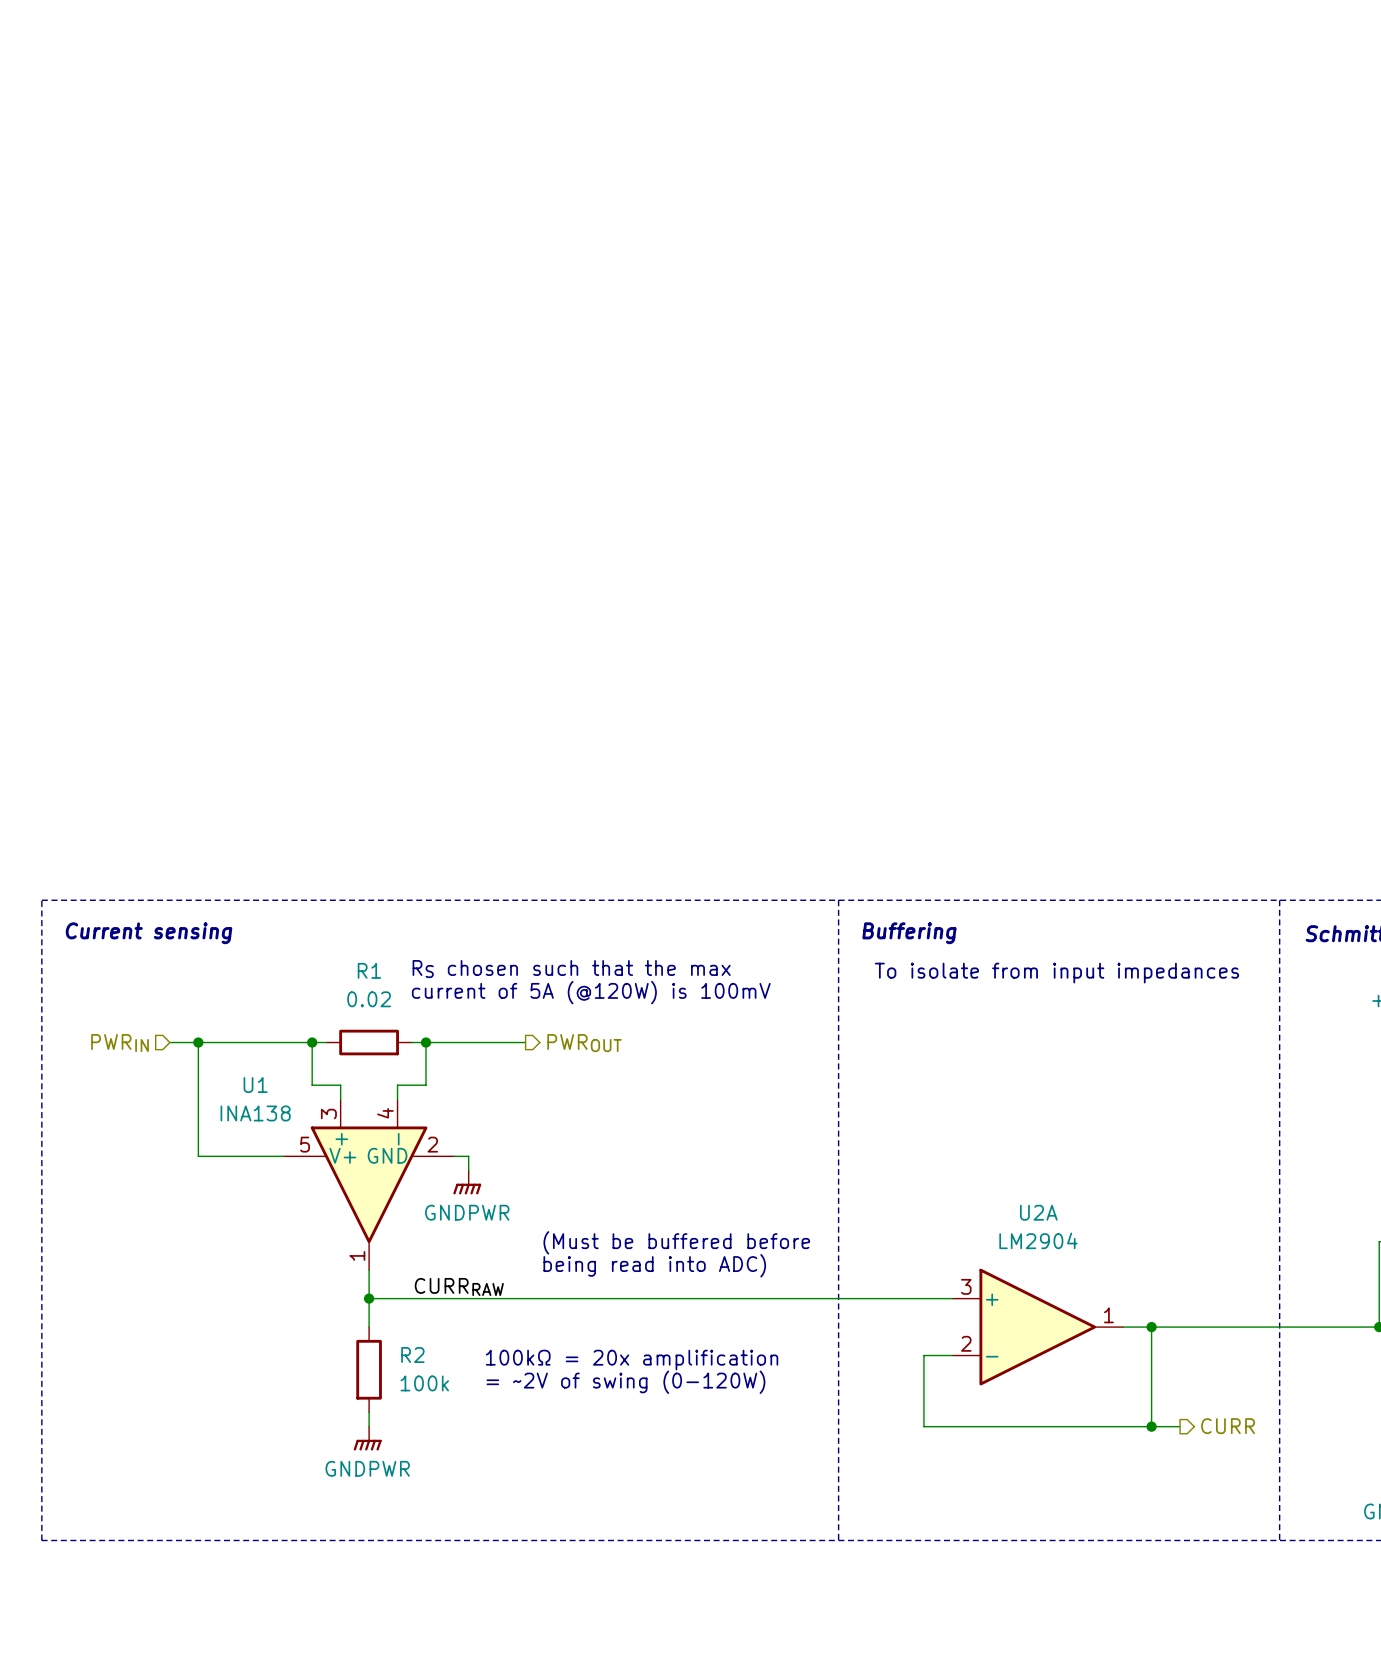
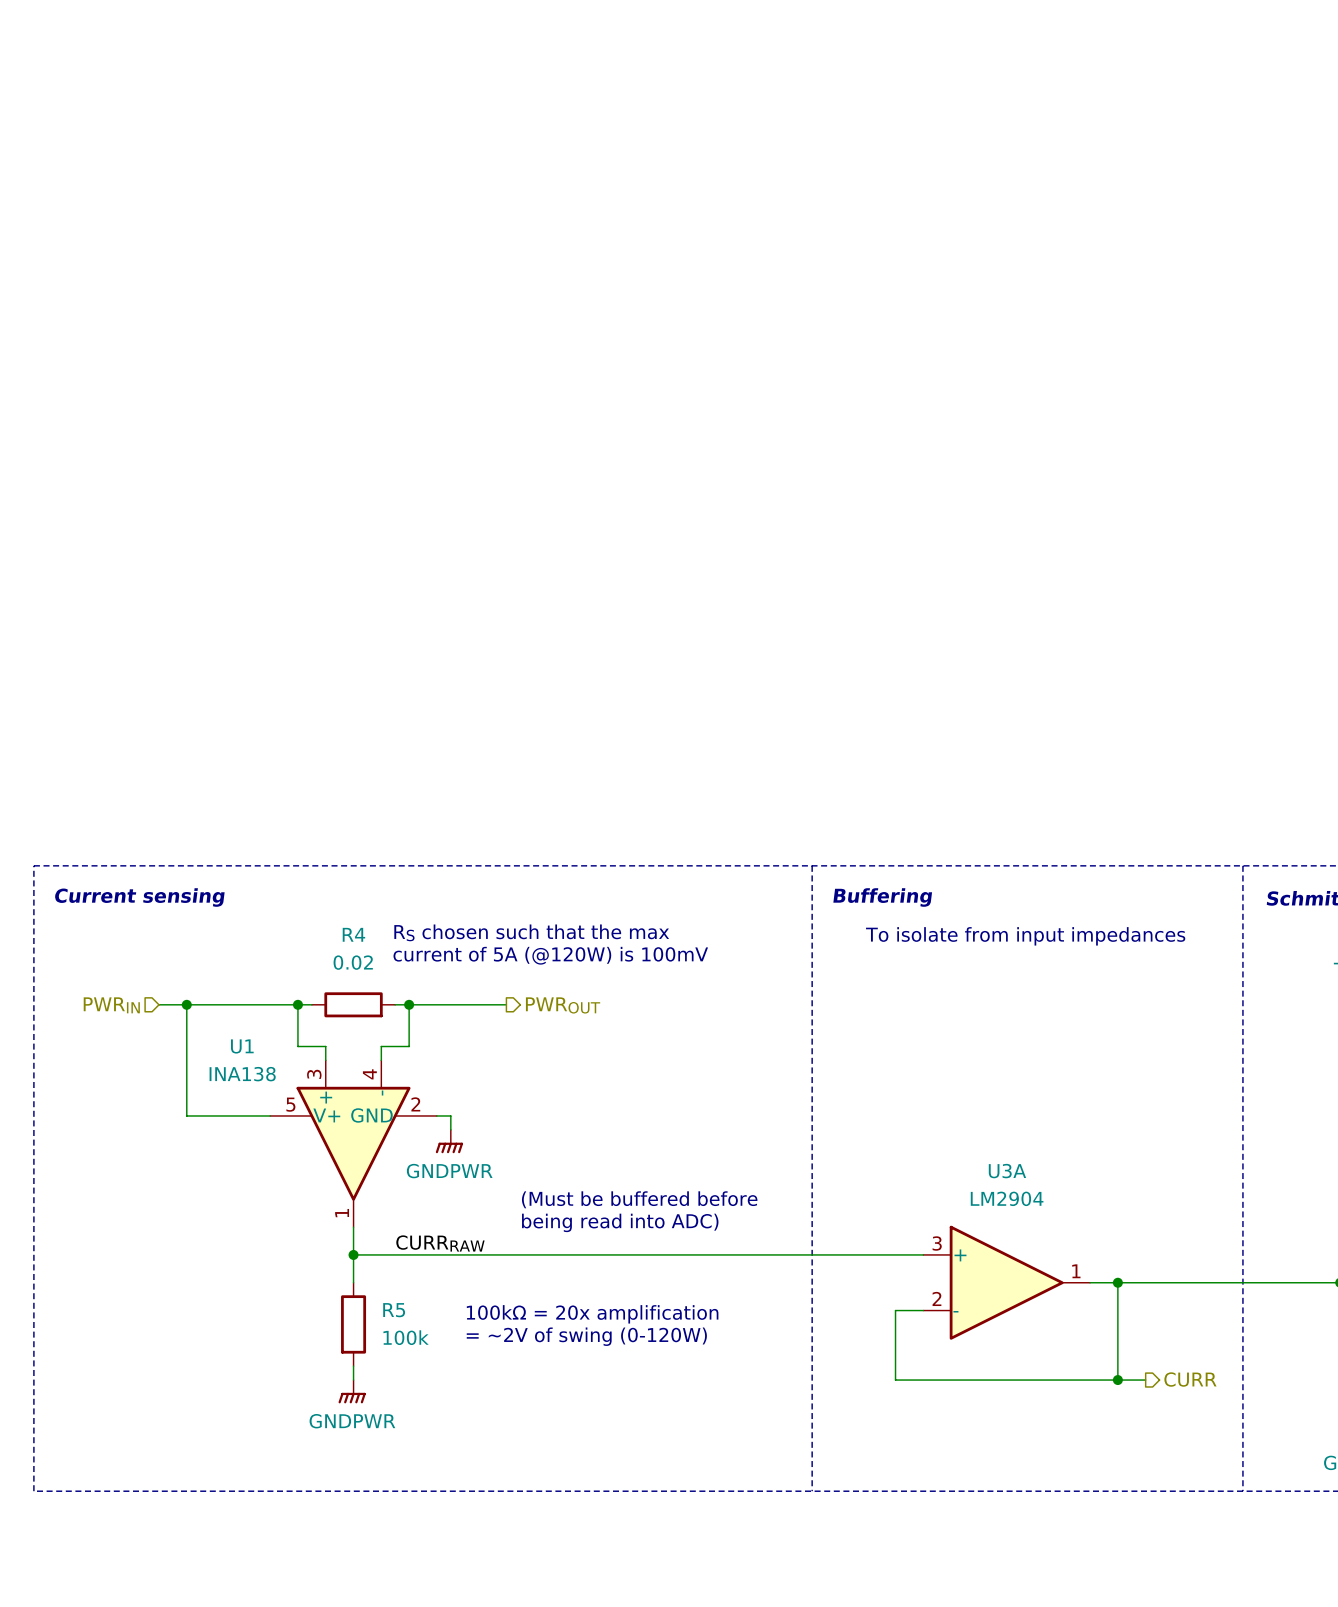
R1 name: R1 (369, 970) -> R4 (353, 934)
U2A name: U2A (1038, 1212) -> U3A (1007, 1171)
R2 name: R2 (412, 1355) -> R5 (394, 1310)

